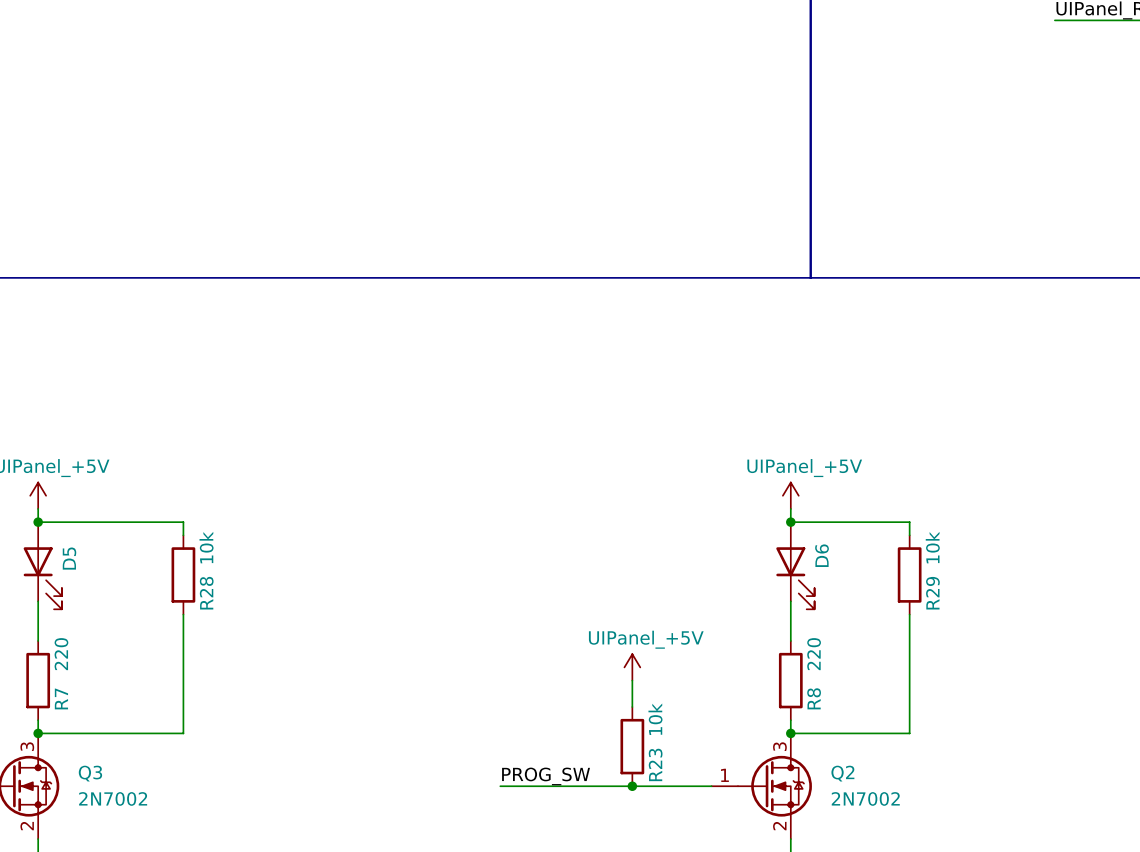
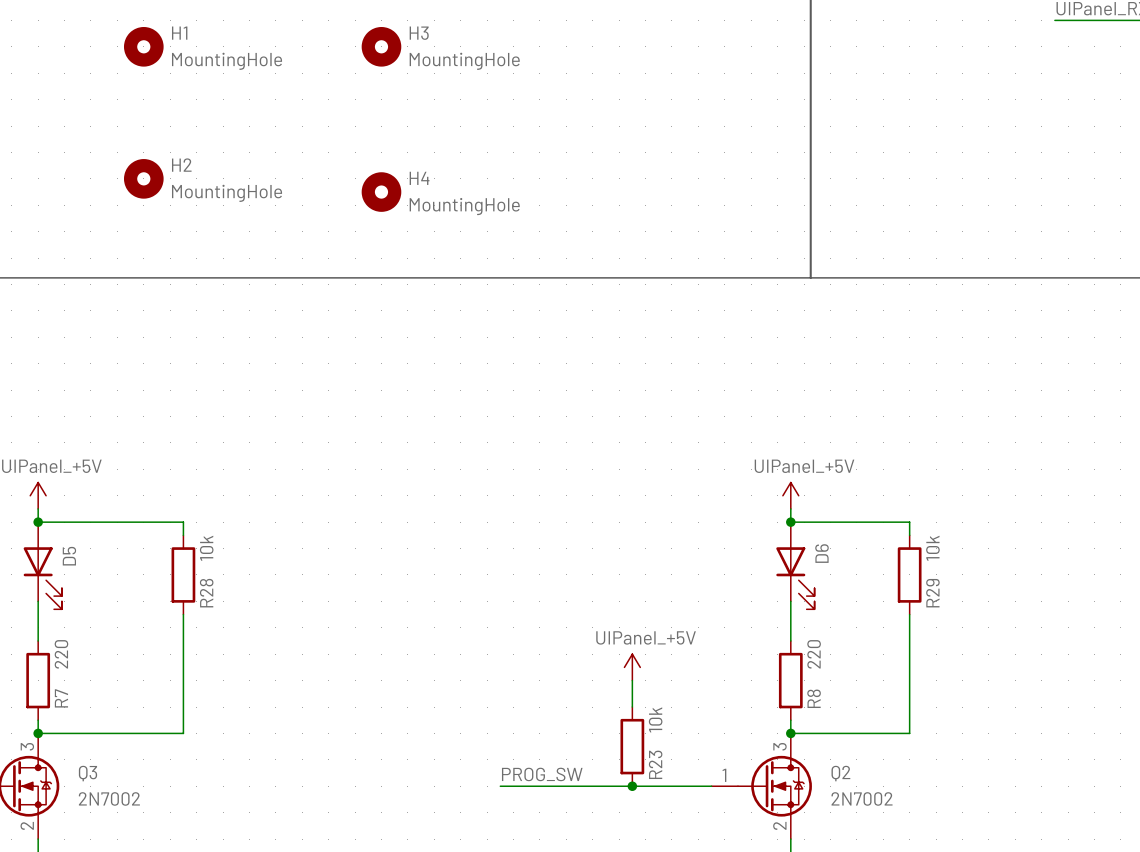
H1: none -> MountingHole (143, 46)
H3: none -> MountingHole (381, 46)
H2: none -> MountingHole (143, 178)
H4: none -> MountingHole (381, 192)

